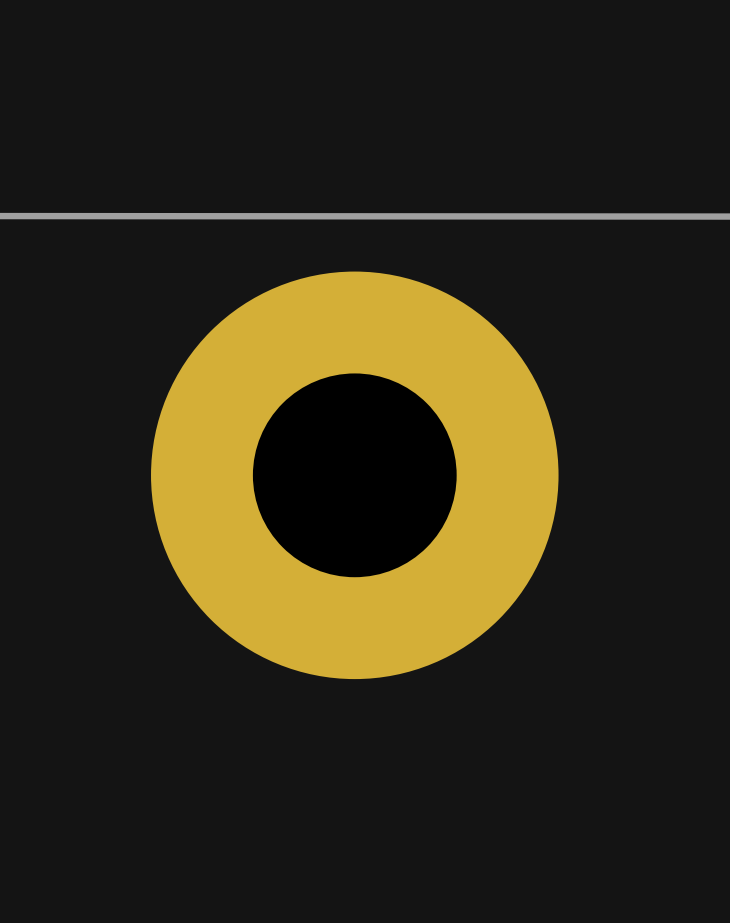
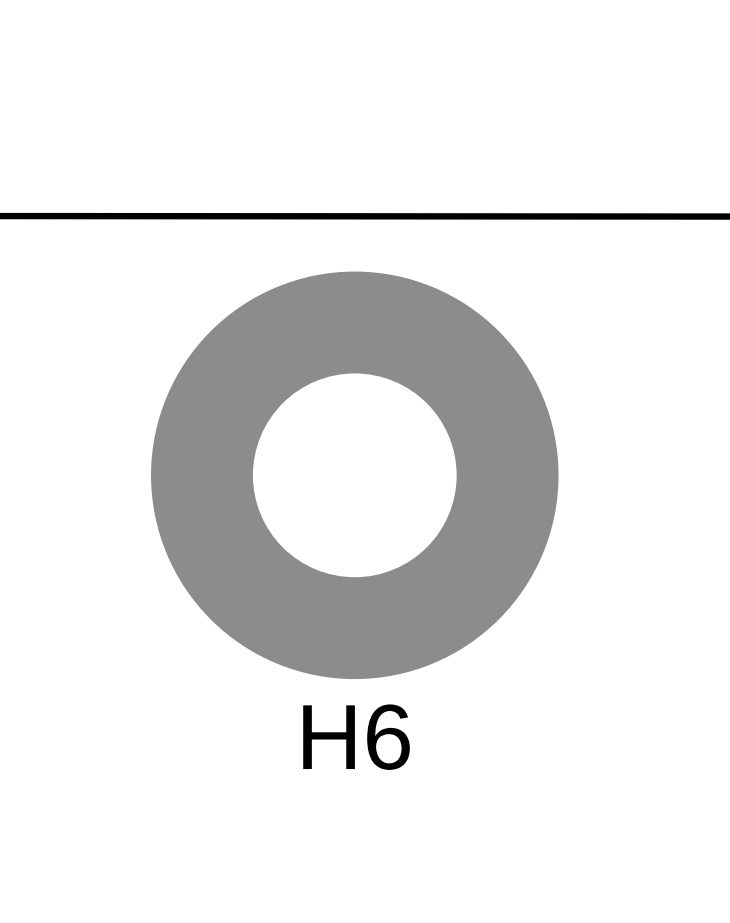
H6 name: none -> H6 (356, 737)

